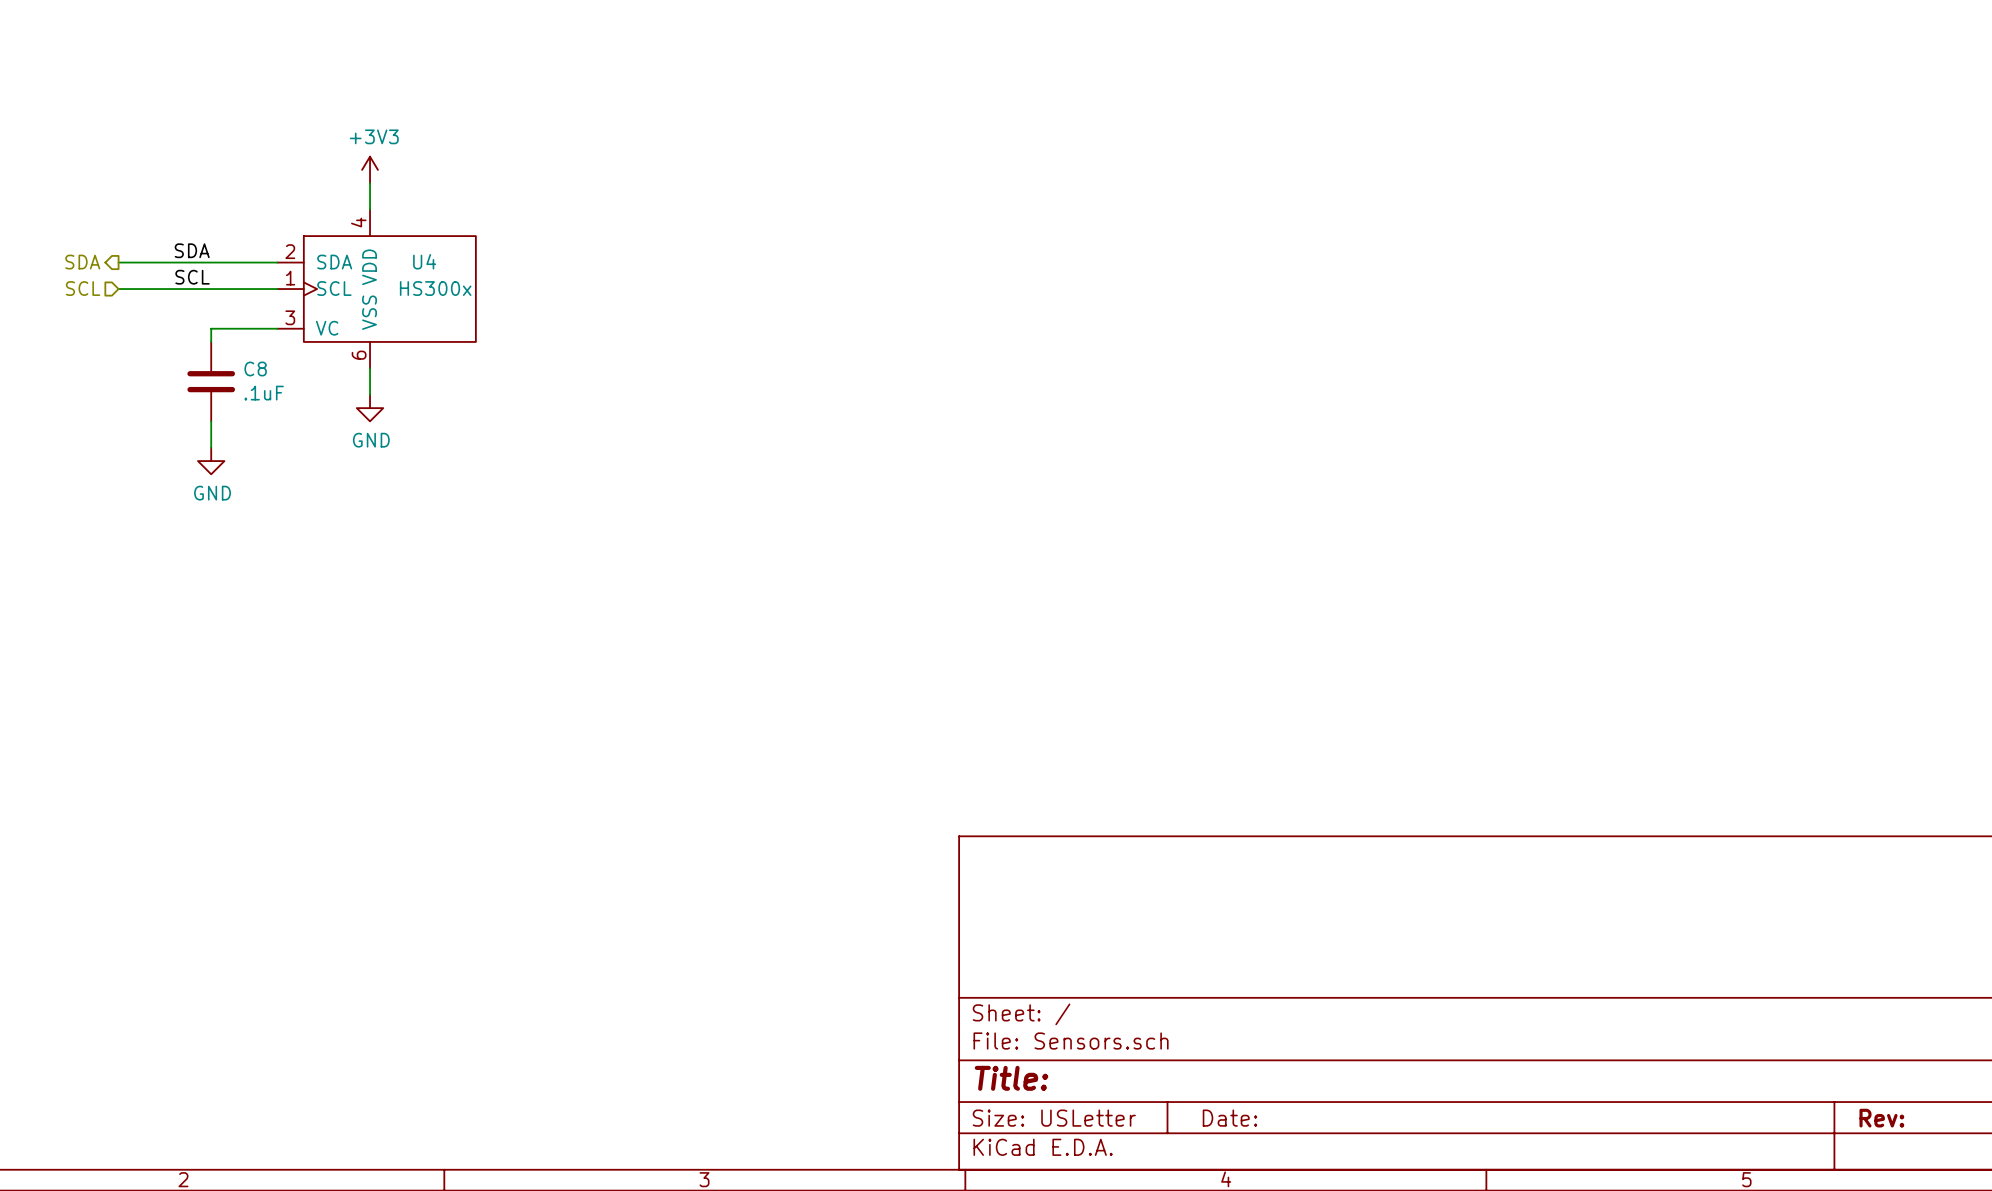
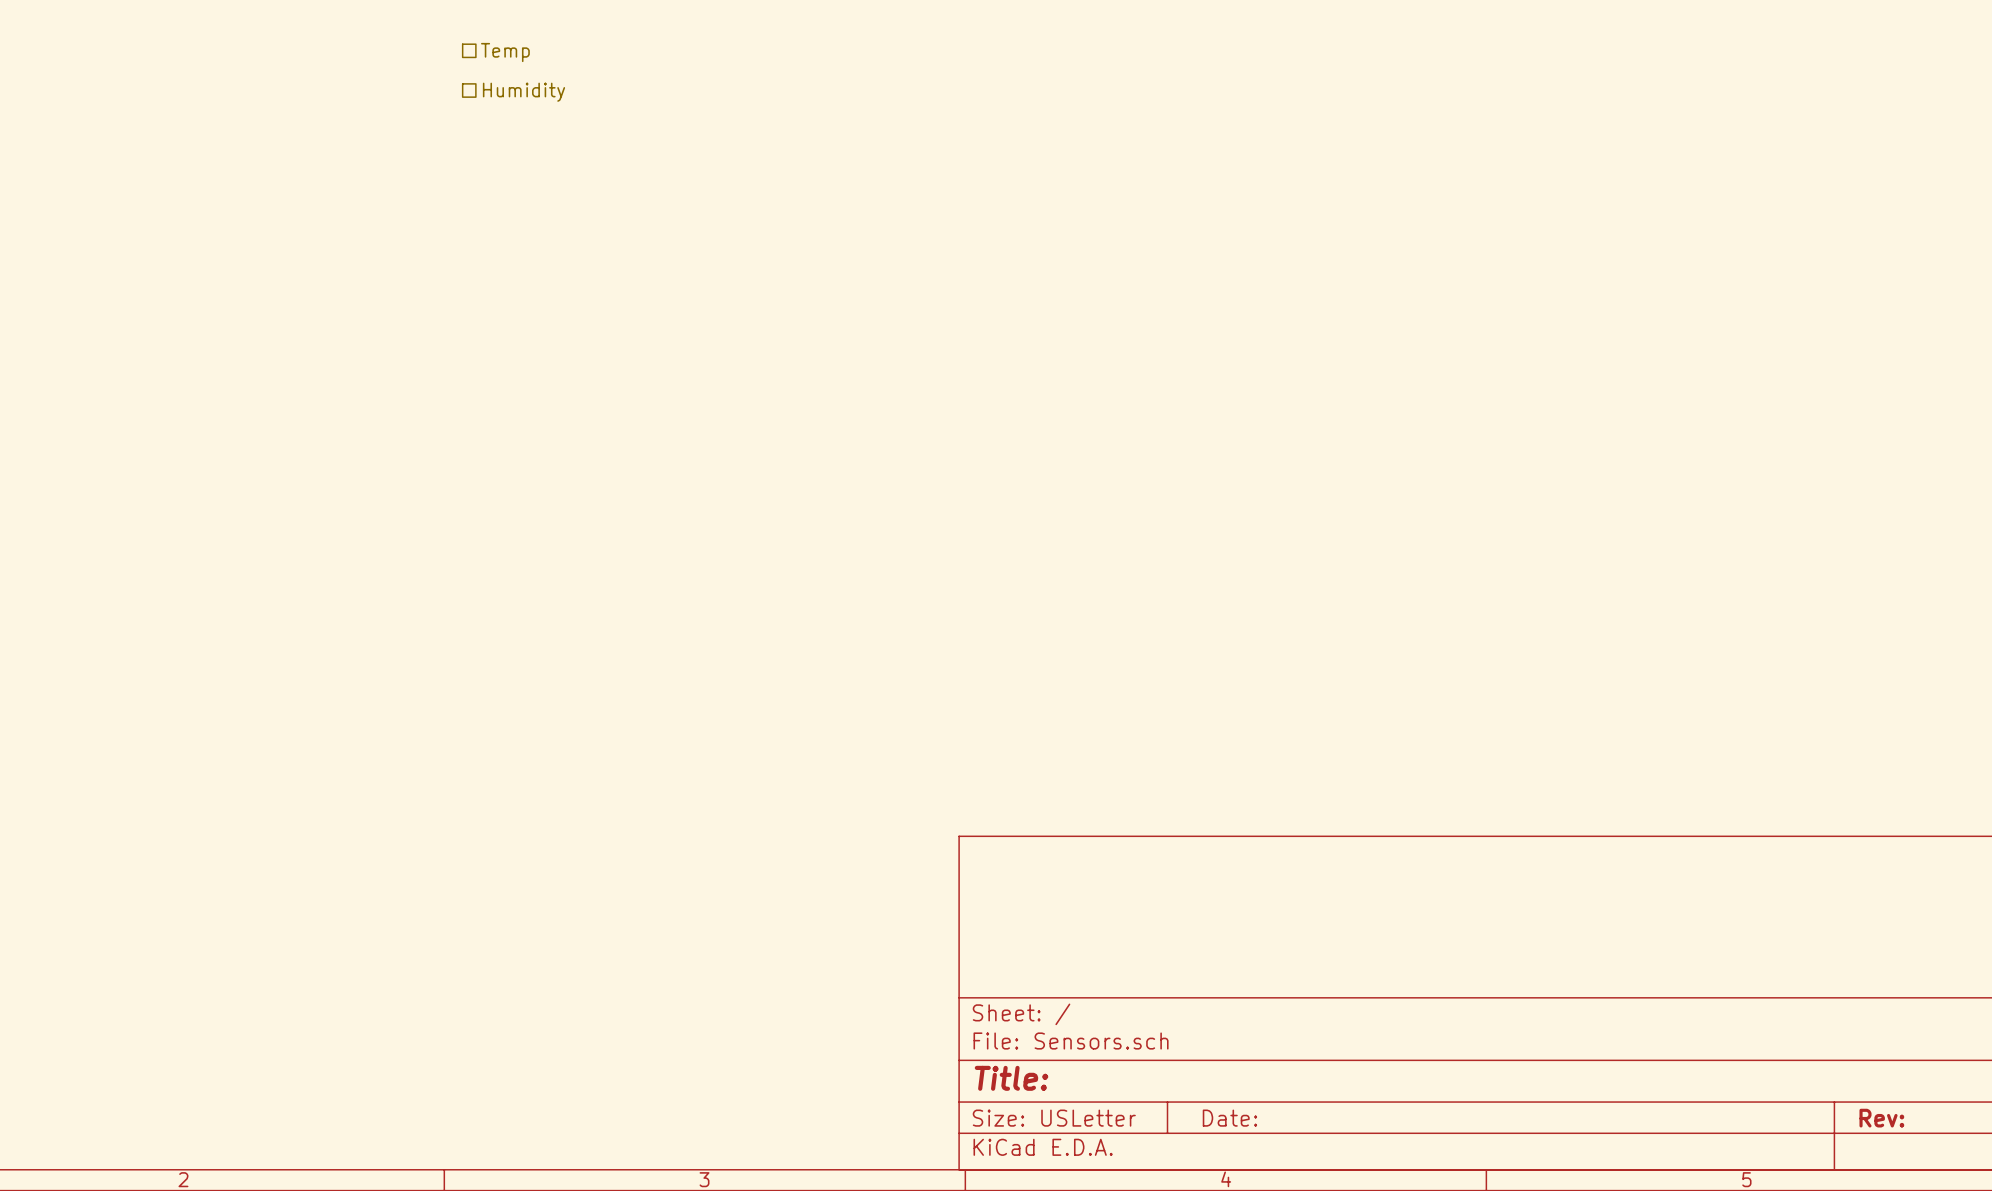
hierarchical label: none -> Temp (505, 52)
hierarchical label: none -> Humidity (523, 92)
power symbol: +3V3 (370, 169) -> none
wire: (370, 183) (370, 209) -> none
label: SDA (192, 250) -> none
hierarchical label: SDA (82, 262) -> none
wire: (118, 262) (277, 262) -> none
label: SCL (192, 277) -> none
hierarchical label: SCL (83, 288) -> none
wire: (118, 289) (277, 289) -> none
U4: HS300x (376, 289) -> none
wire: (277, 328) (211, 328) (211, 341) -> none
wire: (370, 368) (370, 394) -> none
C8: .1uF (211, 381) -> none
power symbol: GND (370, 408) -> none
wire: (211, 421) (211, 447) -> none
power symbol: GND (211, 461) -> none

